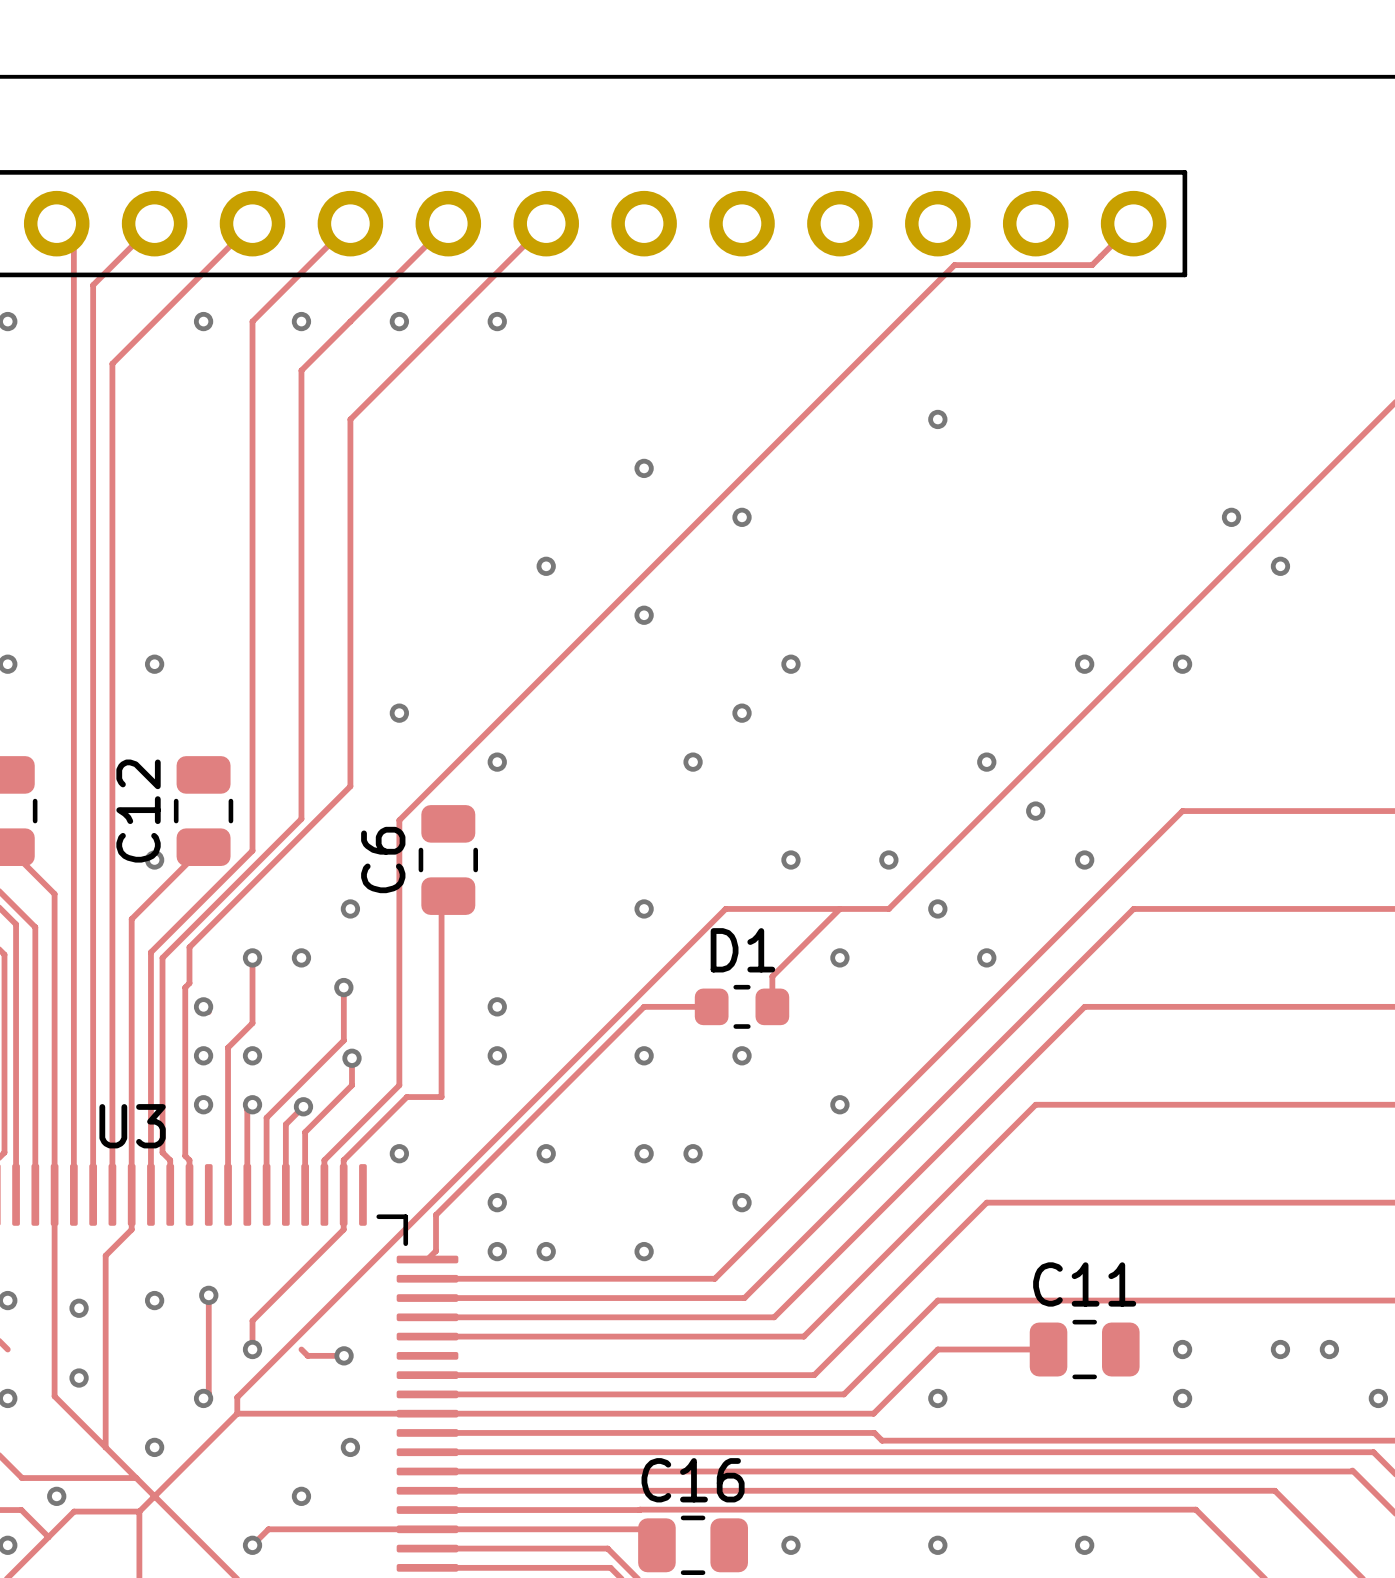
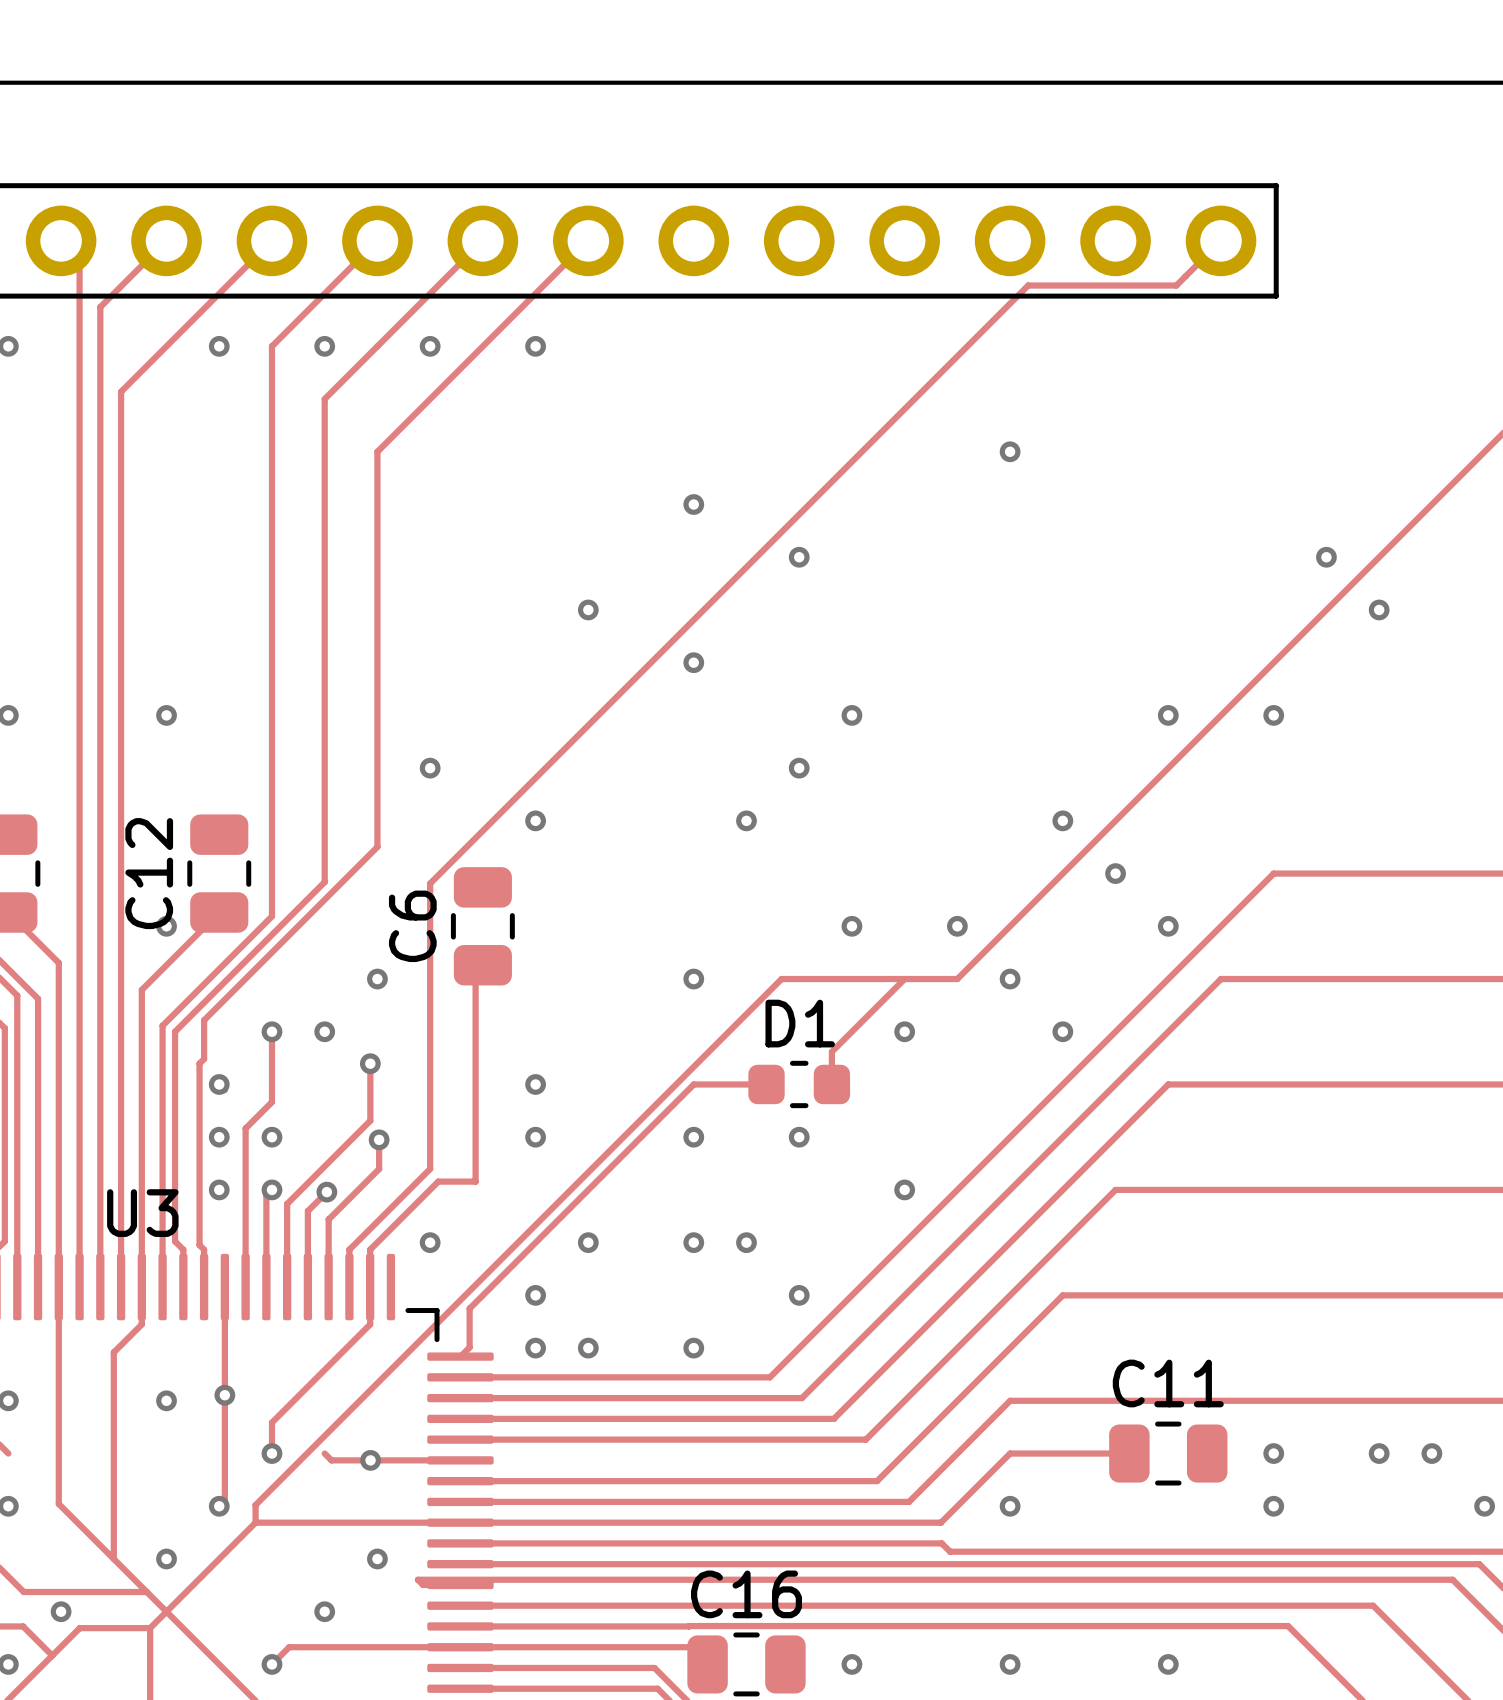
track: none -> (224, 1287) (224, 1395)
via: (79, 1308) -> none
track: none -> (370, 1460) (460, 1460)
via: (79, 1378) -> none
track: (427, 1471) (1351, 1471) -> (460, 1584) (423, 1584) (417, 1579) (1452, 1579) (1456, 1583)

